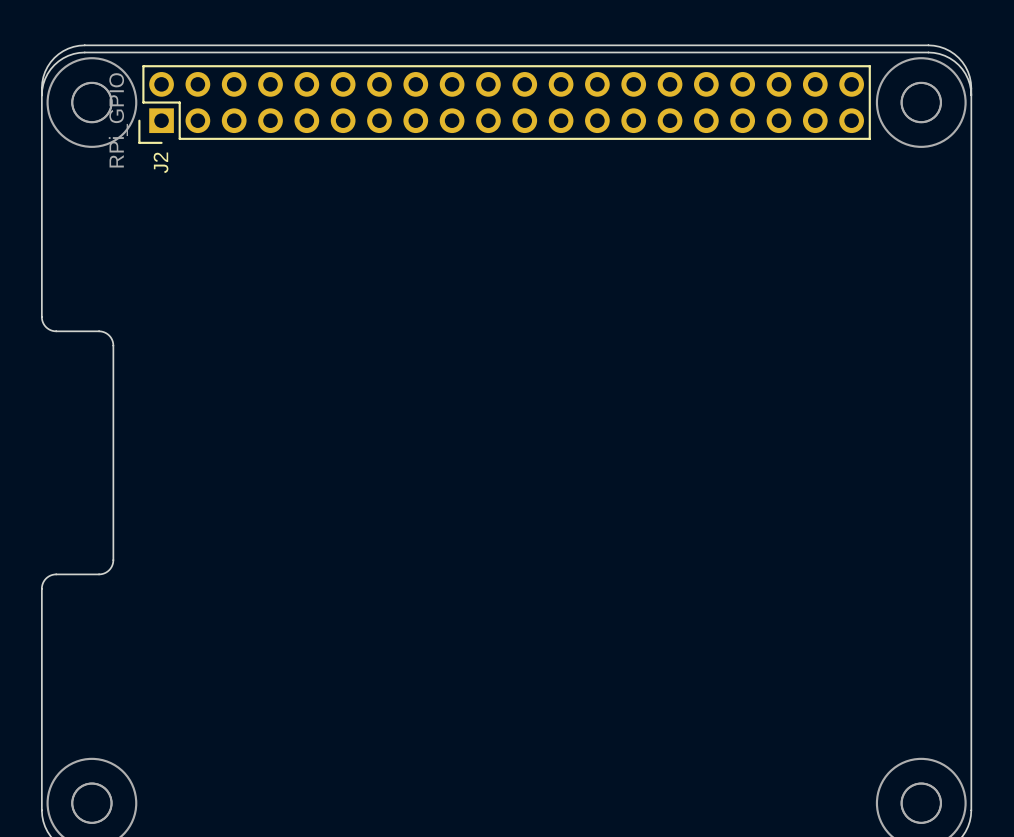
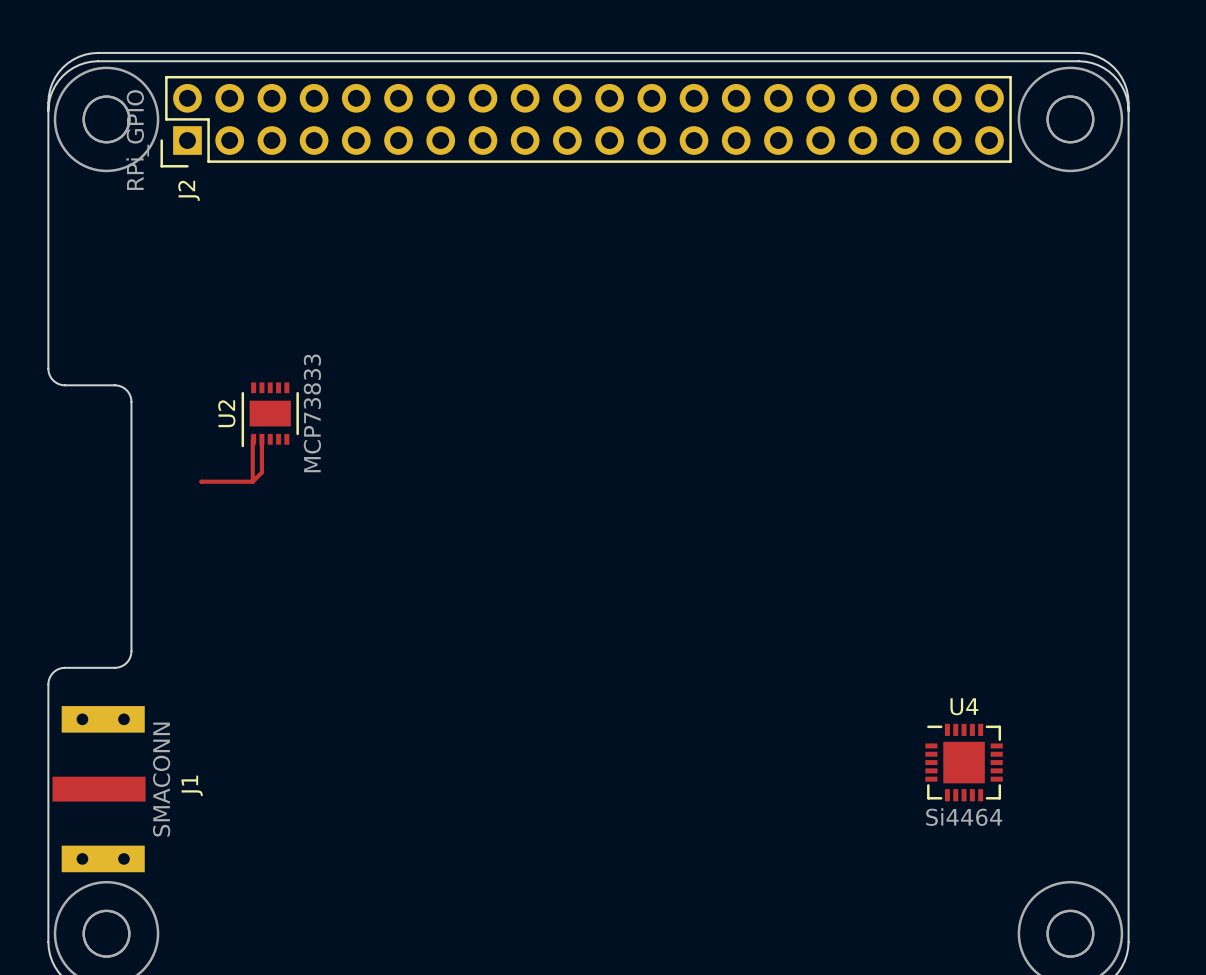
U2: none -> MCP73833 (270, 414)
top track: none -> (253, 439) (252, 481)
top track: none -> (261, 439) (261, 472) (252, 481)
top track: none -> (201, 481) (252, 481)
U4: none -> Si4464 (964, 762)
J1: none -> SMACONN (99, 789)

